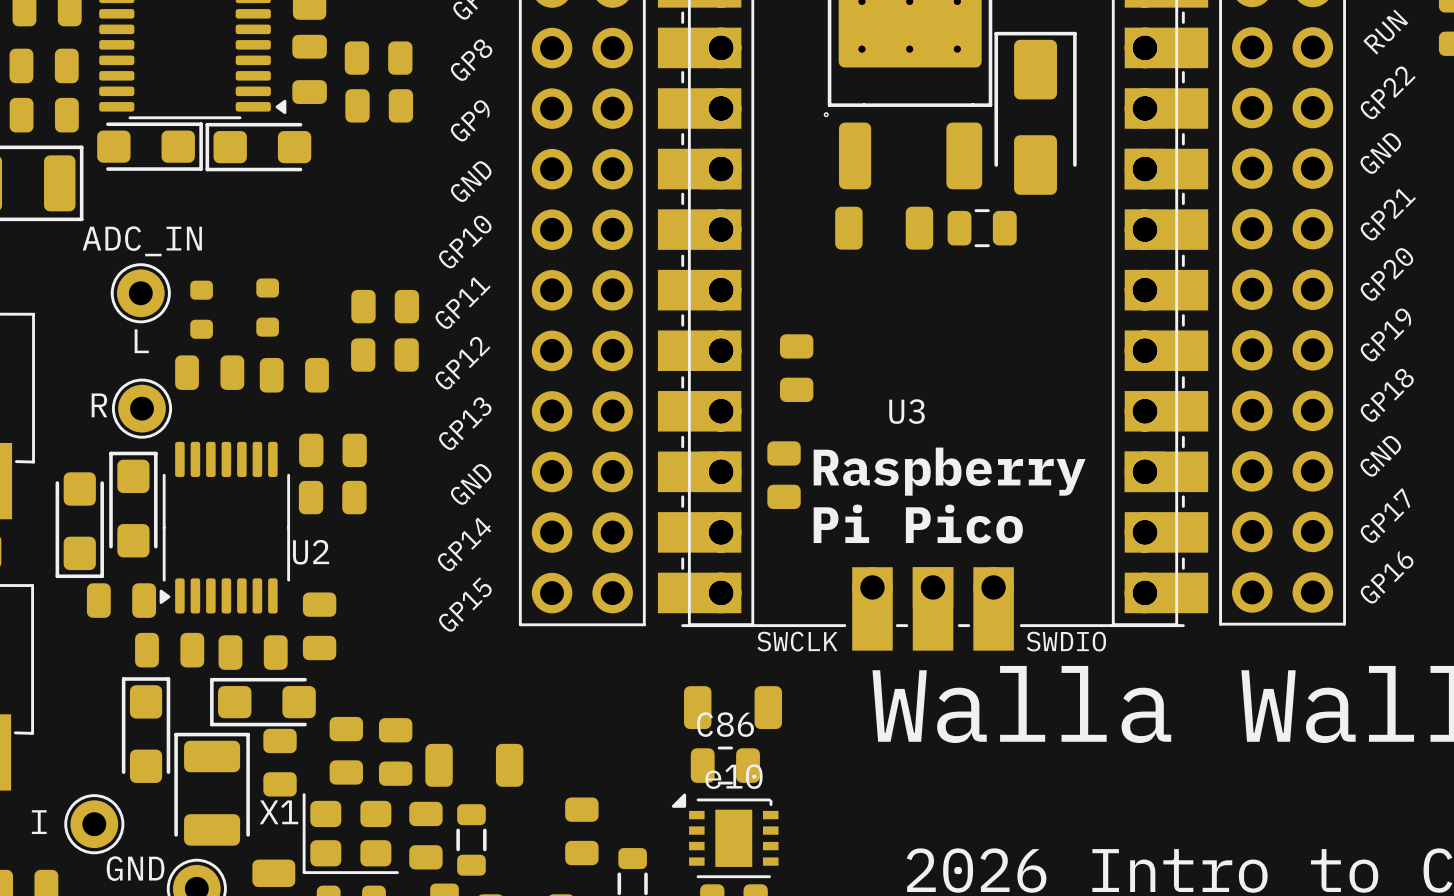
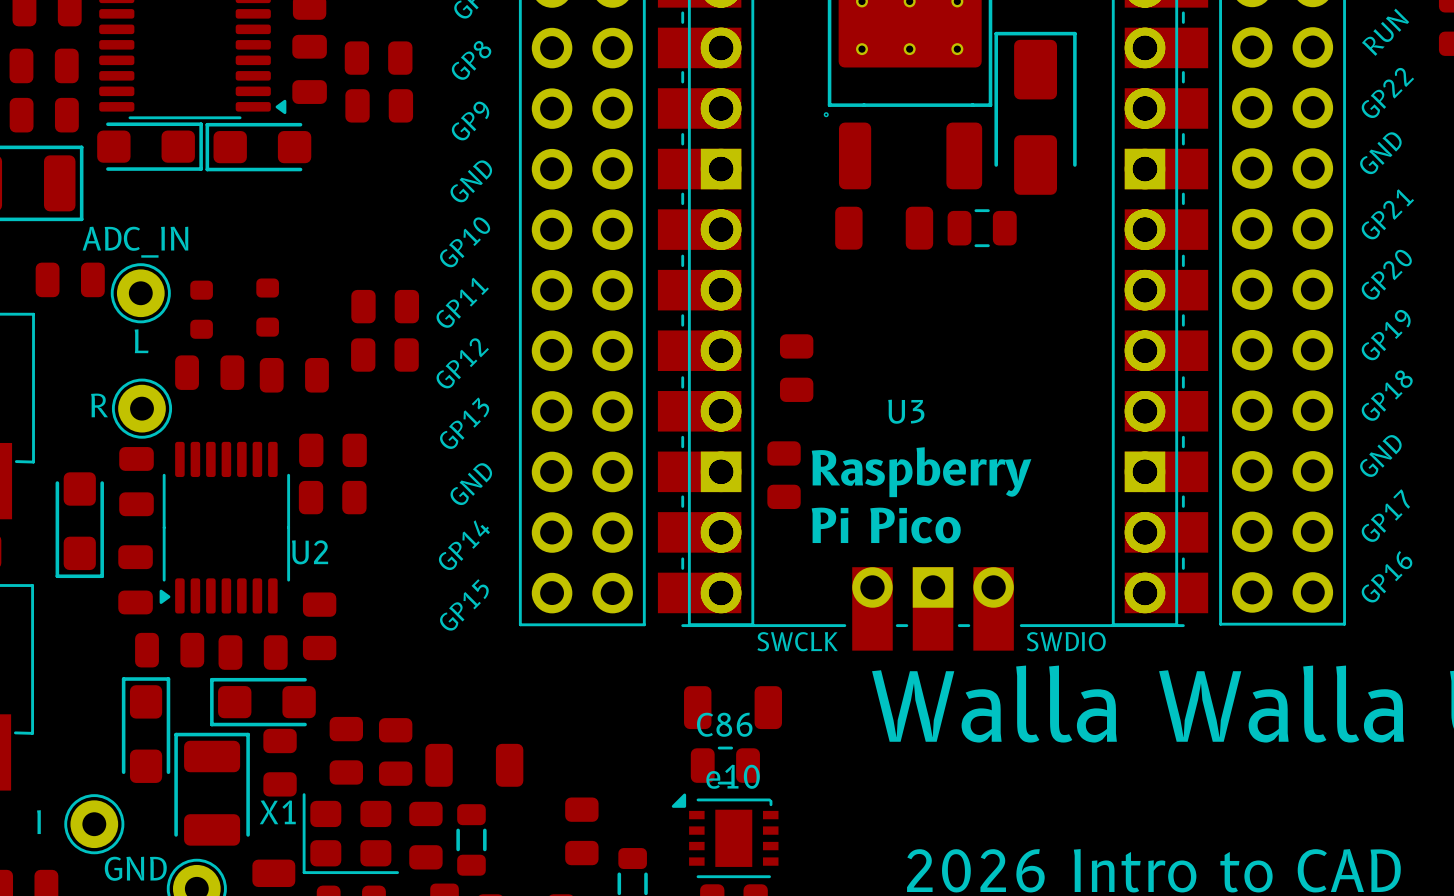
part: none -> (70, 279)
part footprint: [109, 451, 158, 558] -> [119, 447, 154, 517]
part rotation: 0° (121, 600) -> 90° clockwise (135, 579)

